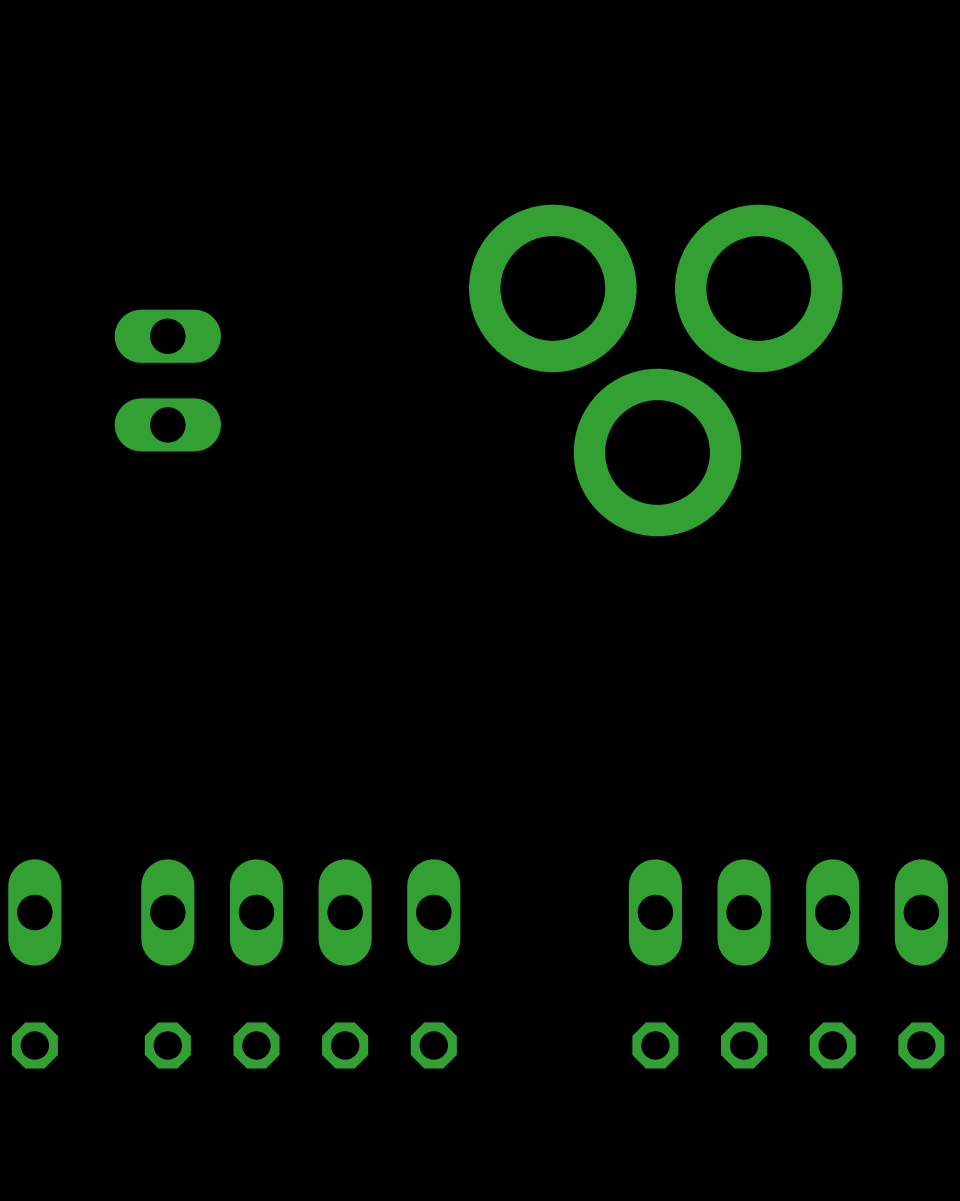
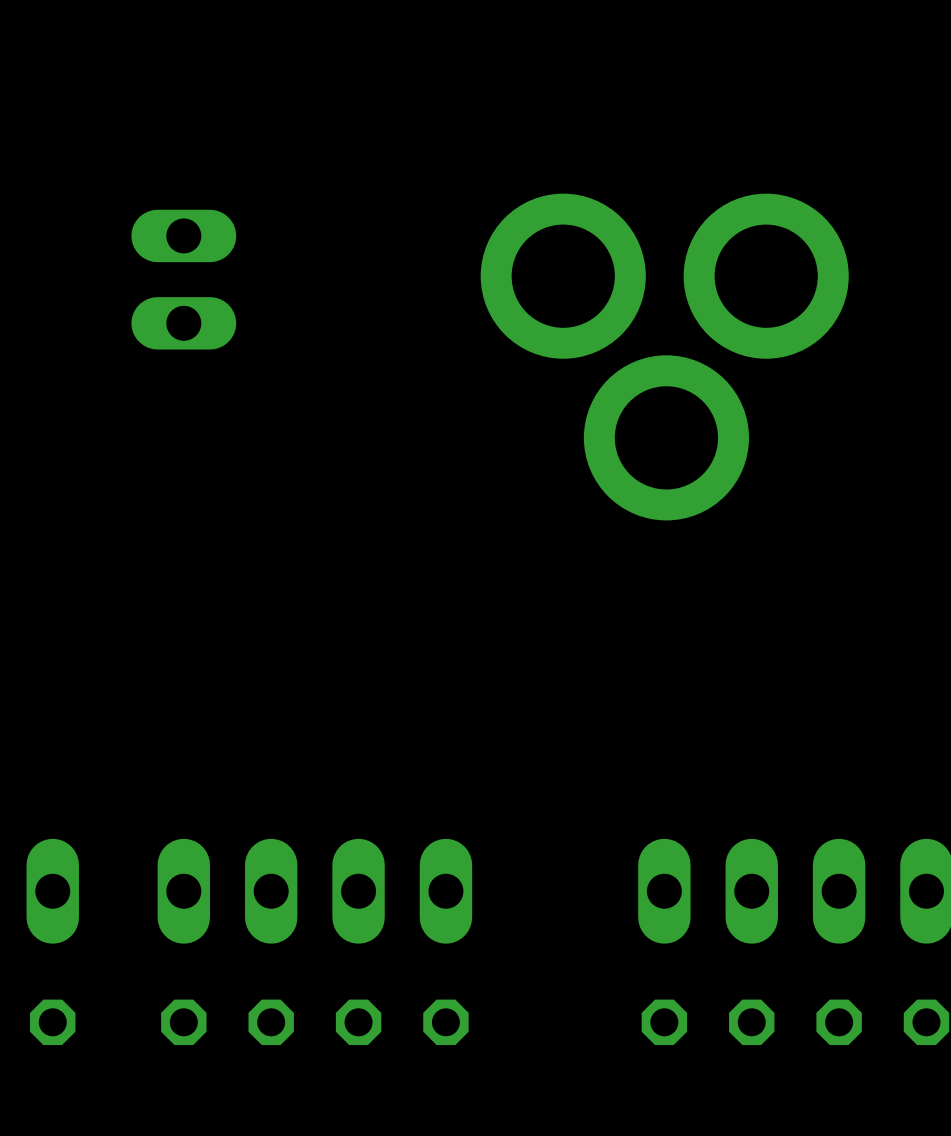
part position: (167, 380) -> (183, 279)

